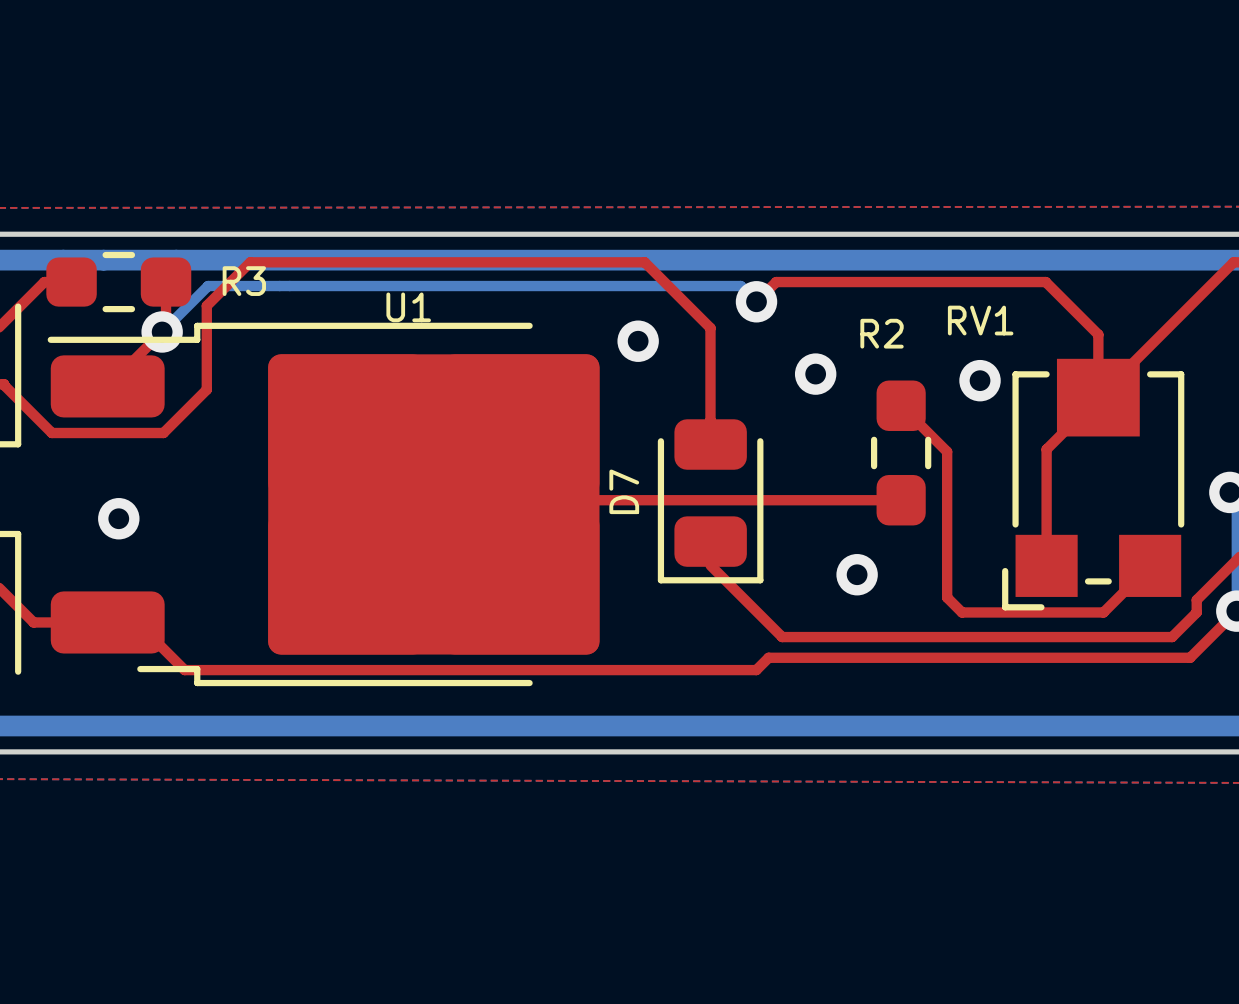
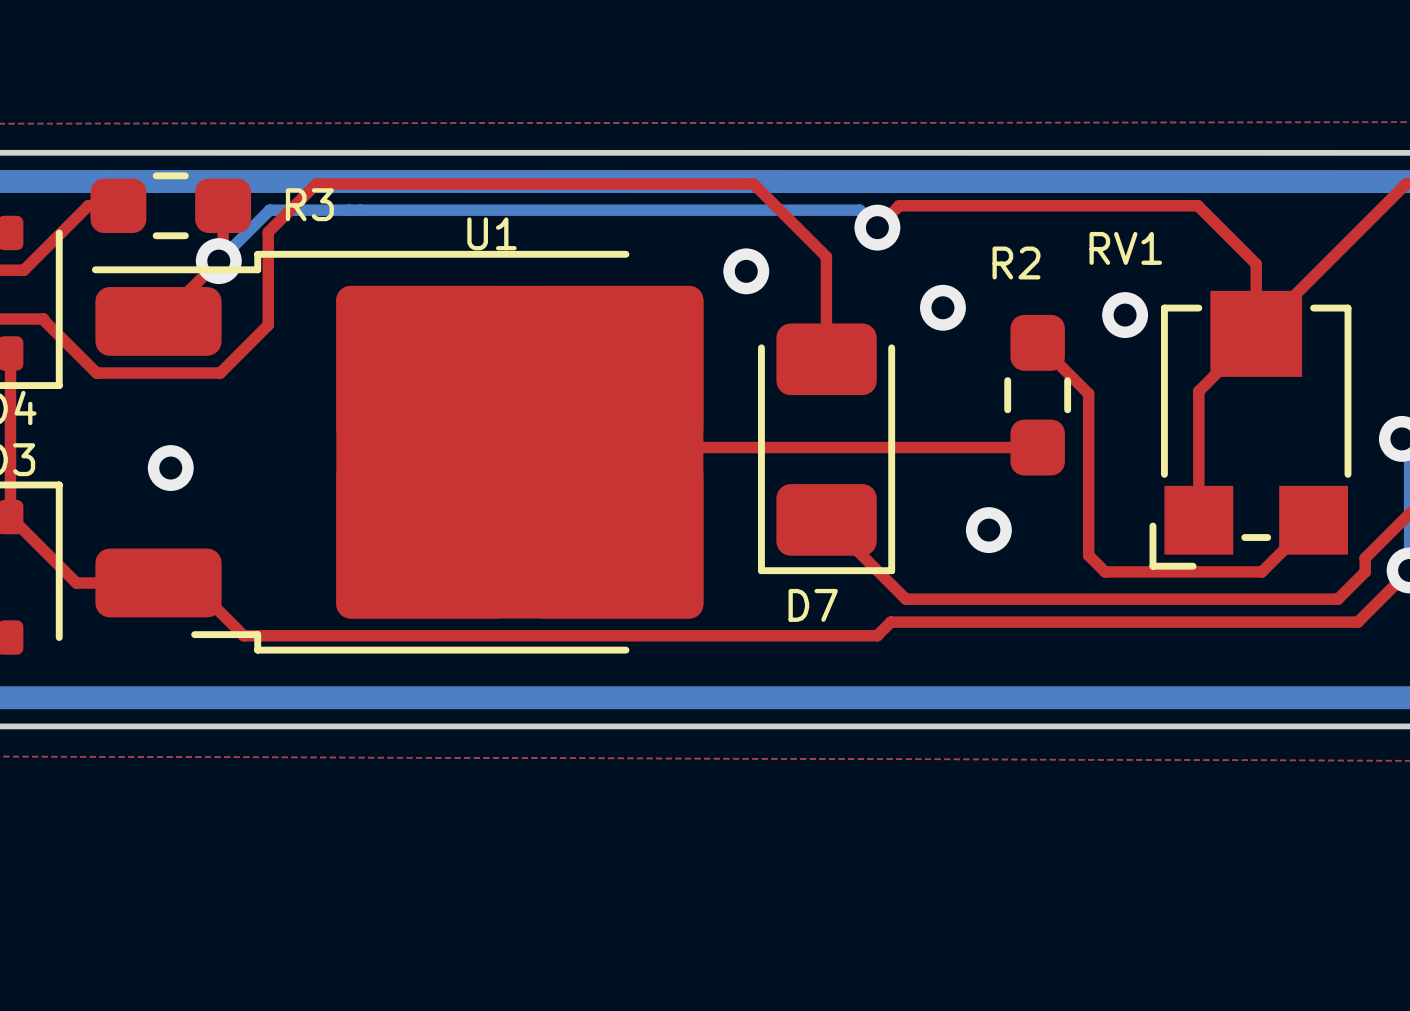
D7 footprint: [657, 419, 764, 584] -> [758, 323, 896, 575]
D7 name rotation: 0° (624, 491) -> 90° clockwise (813, 605)
D7 name position: D7 (624, 491) -> D7 (813, 605)

